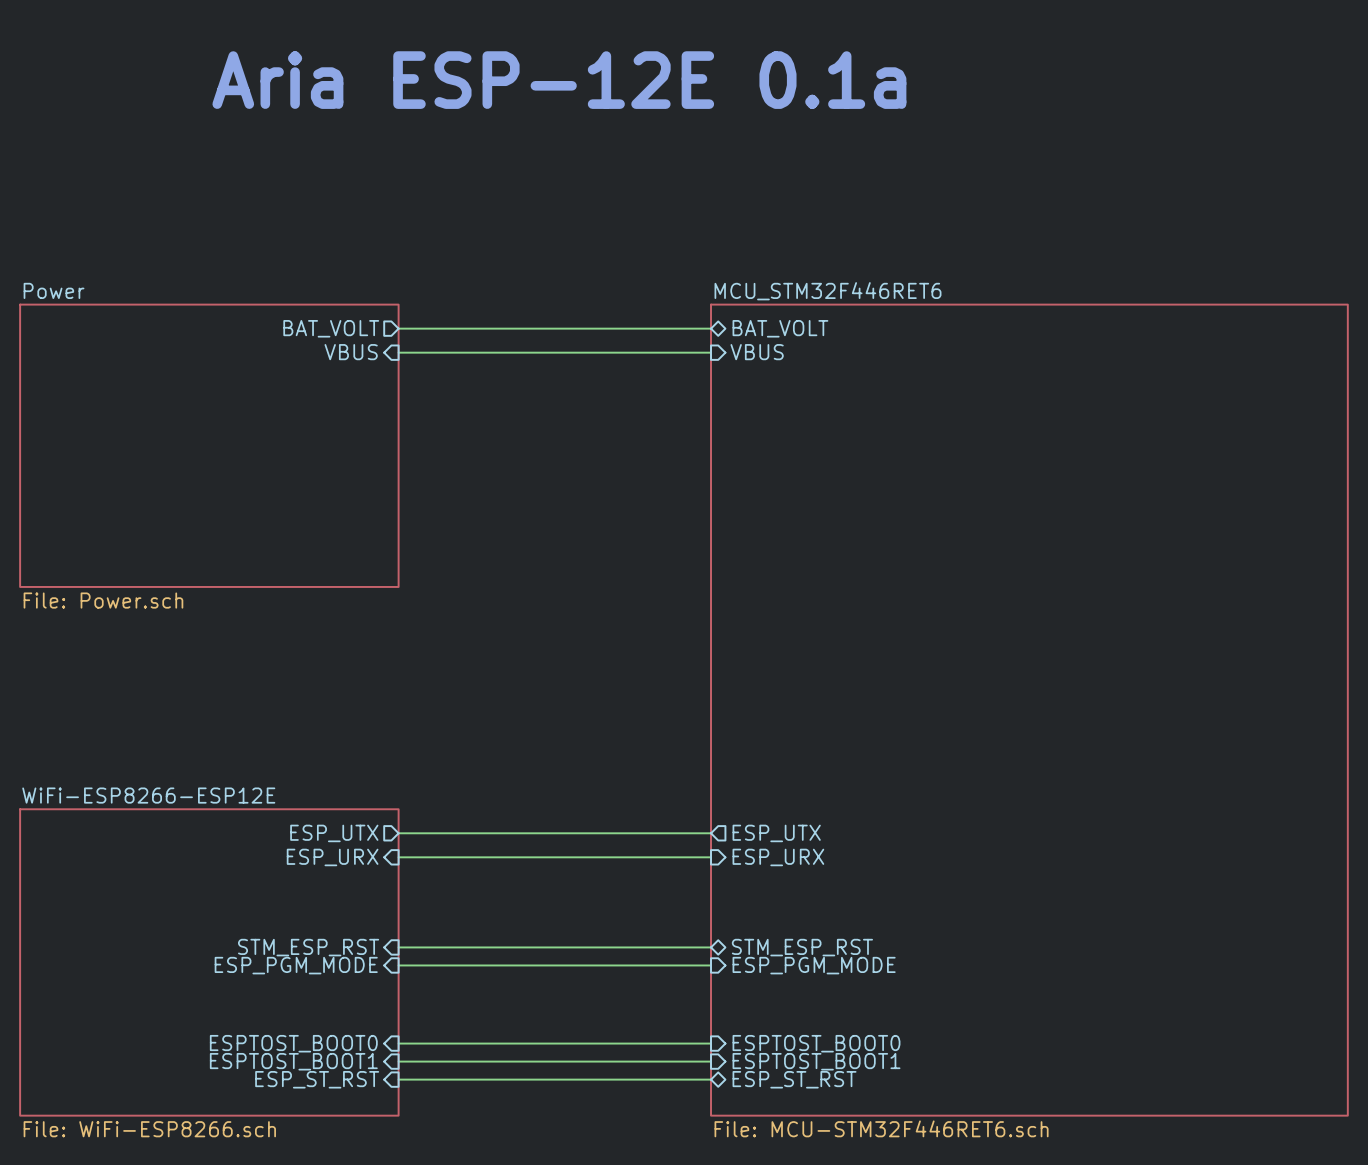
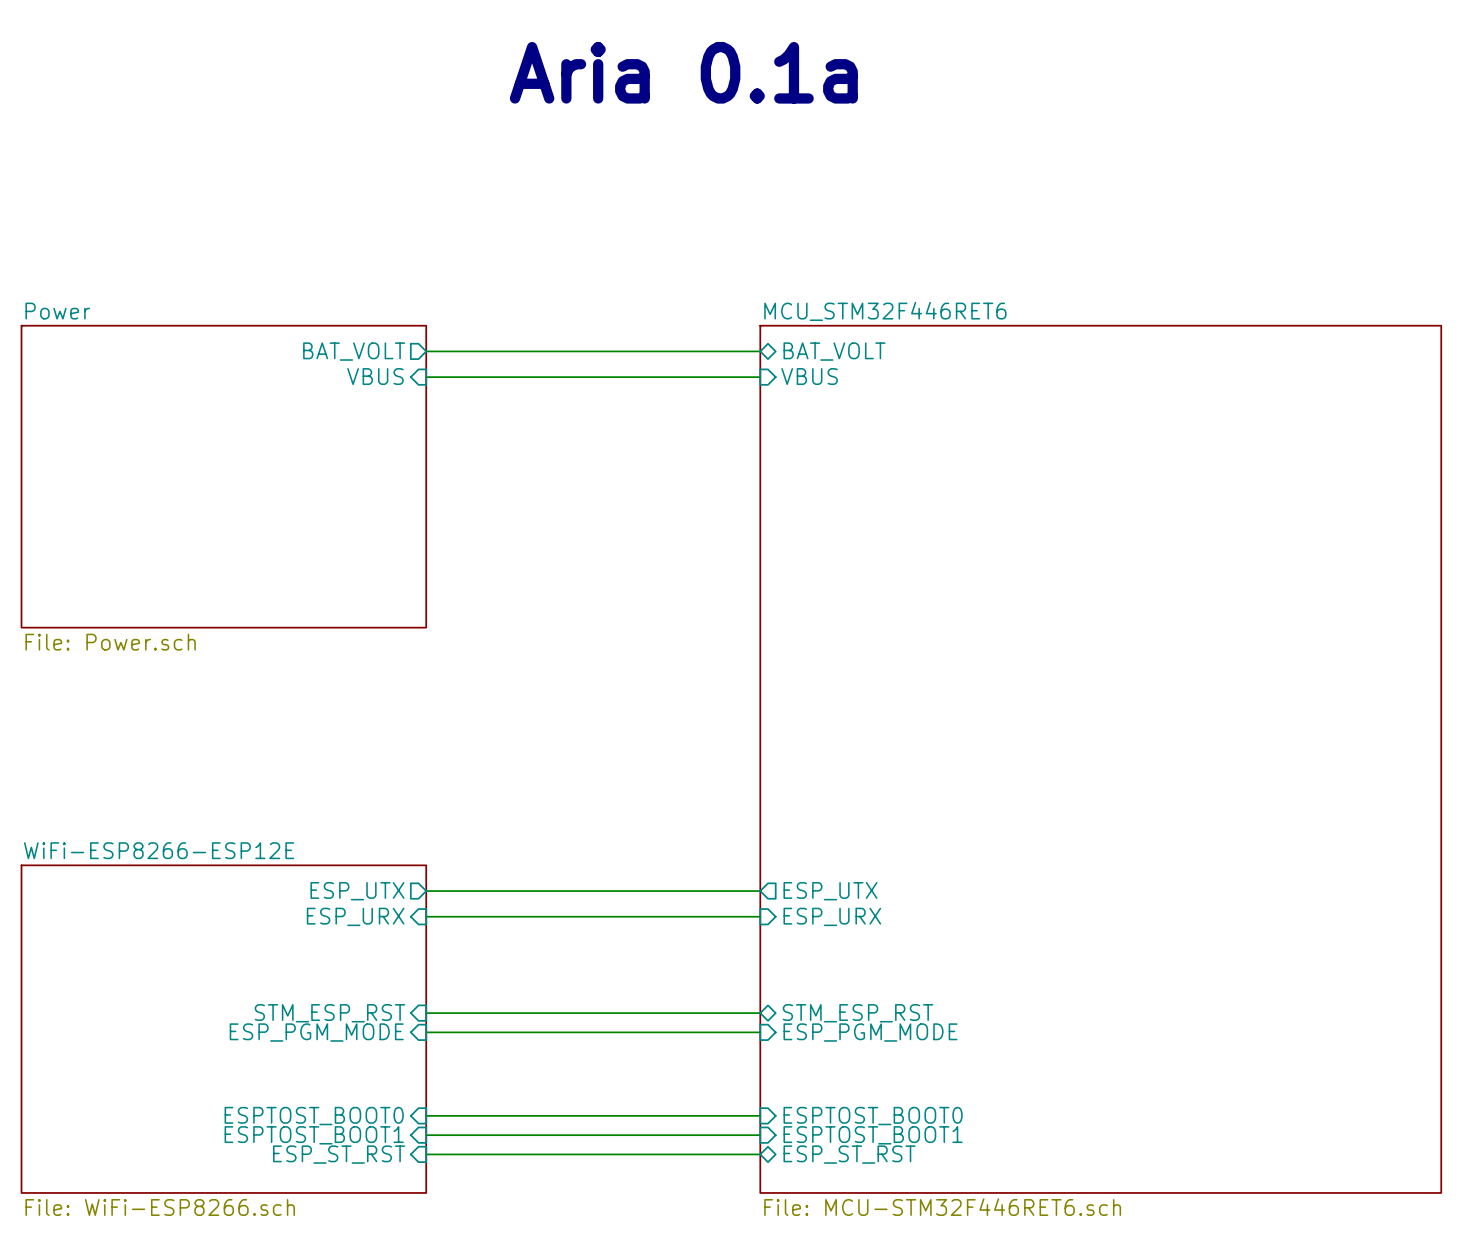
text: none -> Aria 0.1a (683, 72)
text: Aria ESP-12E 0.1a (559, 80) -> none

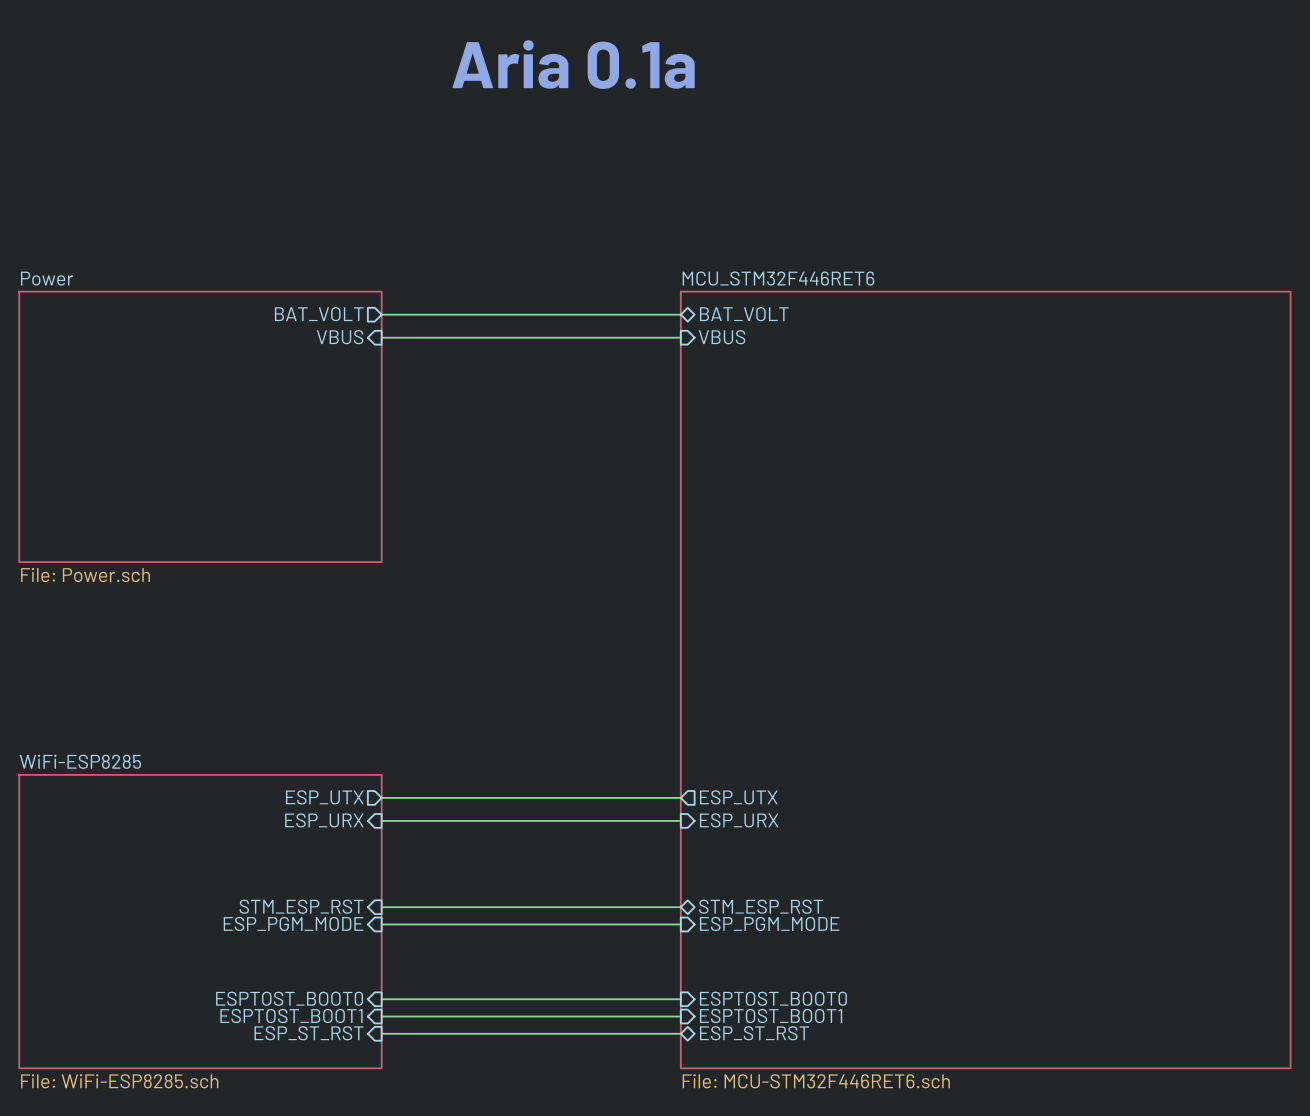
sheet WiFi-ESP8266-ESP12E name: WiFi-ESP8266-ESP12E (159, 850) -> WiFi-ESP8285 (80, 761)
sheet WiFi-ESP8266-ESP12E value: File: WiFi-ESP8266.sch (160, 1207) -> File: WiFi-ESP8285.sch (119, 1081)

